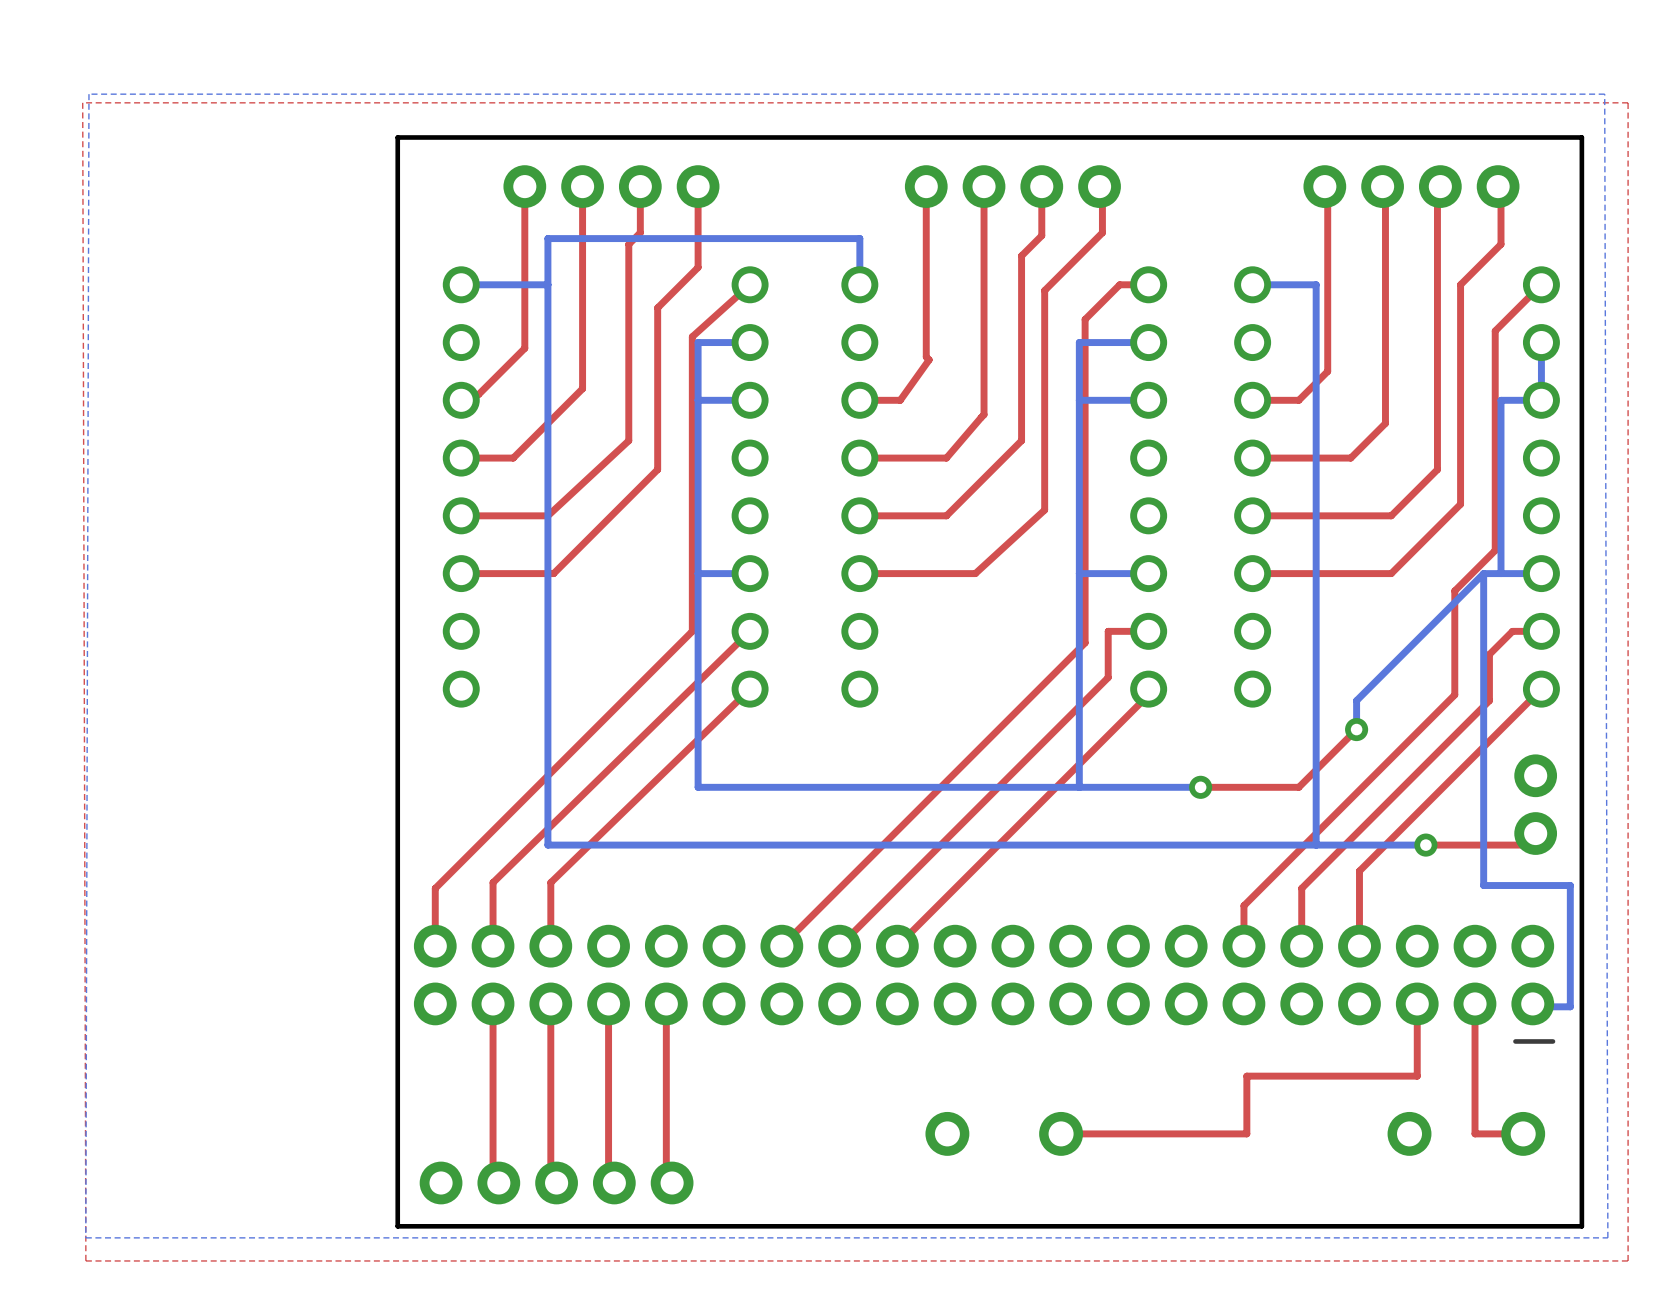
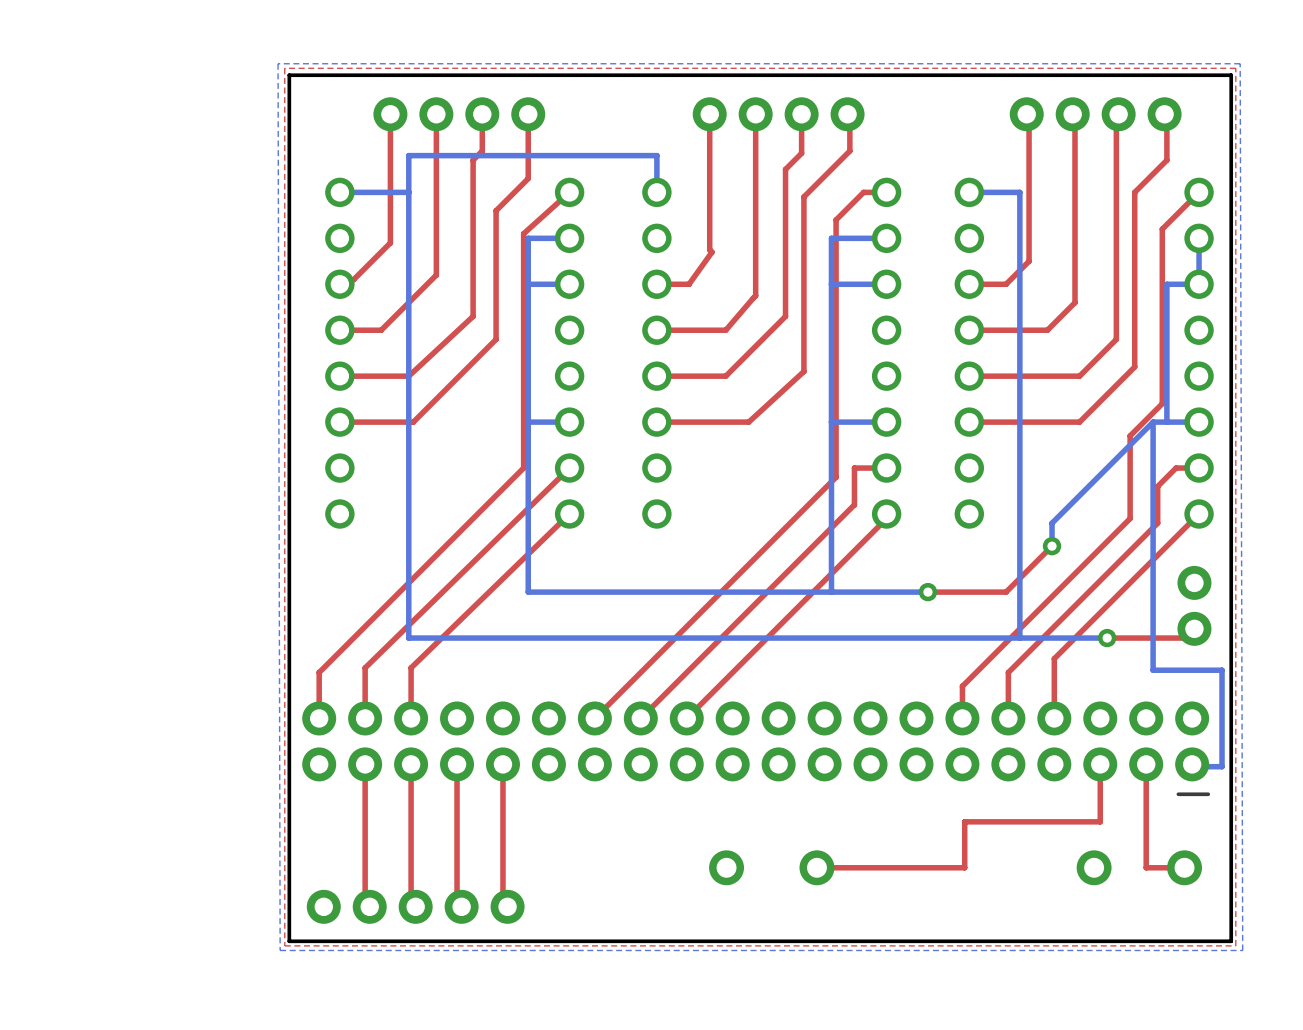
top zone outline: (1628, 102) (82, 102) (85, 1260) (1628, 1260) (1628, 102) -> (1235, 68) (1235, 945) (284, 945) (284, 68) (1235, 68)
bottom zone outline: (1596, 1237) (1607, 1237) (1604, 94) (88, 94) (85, 1237) (386, 1237) -> (1242, 950) (1240, 63) (278, 63) (280, 950)

